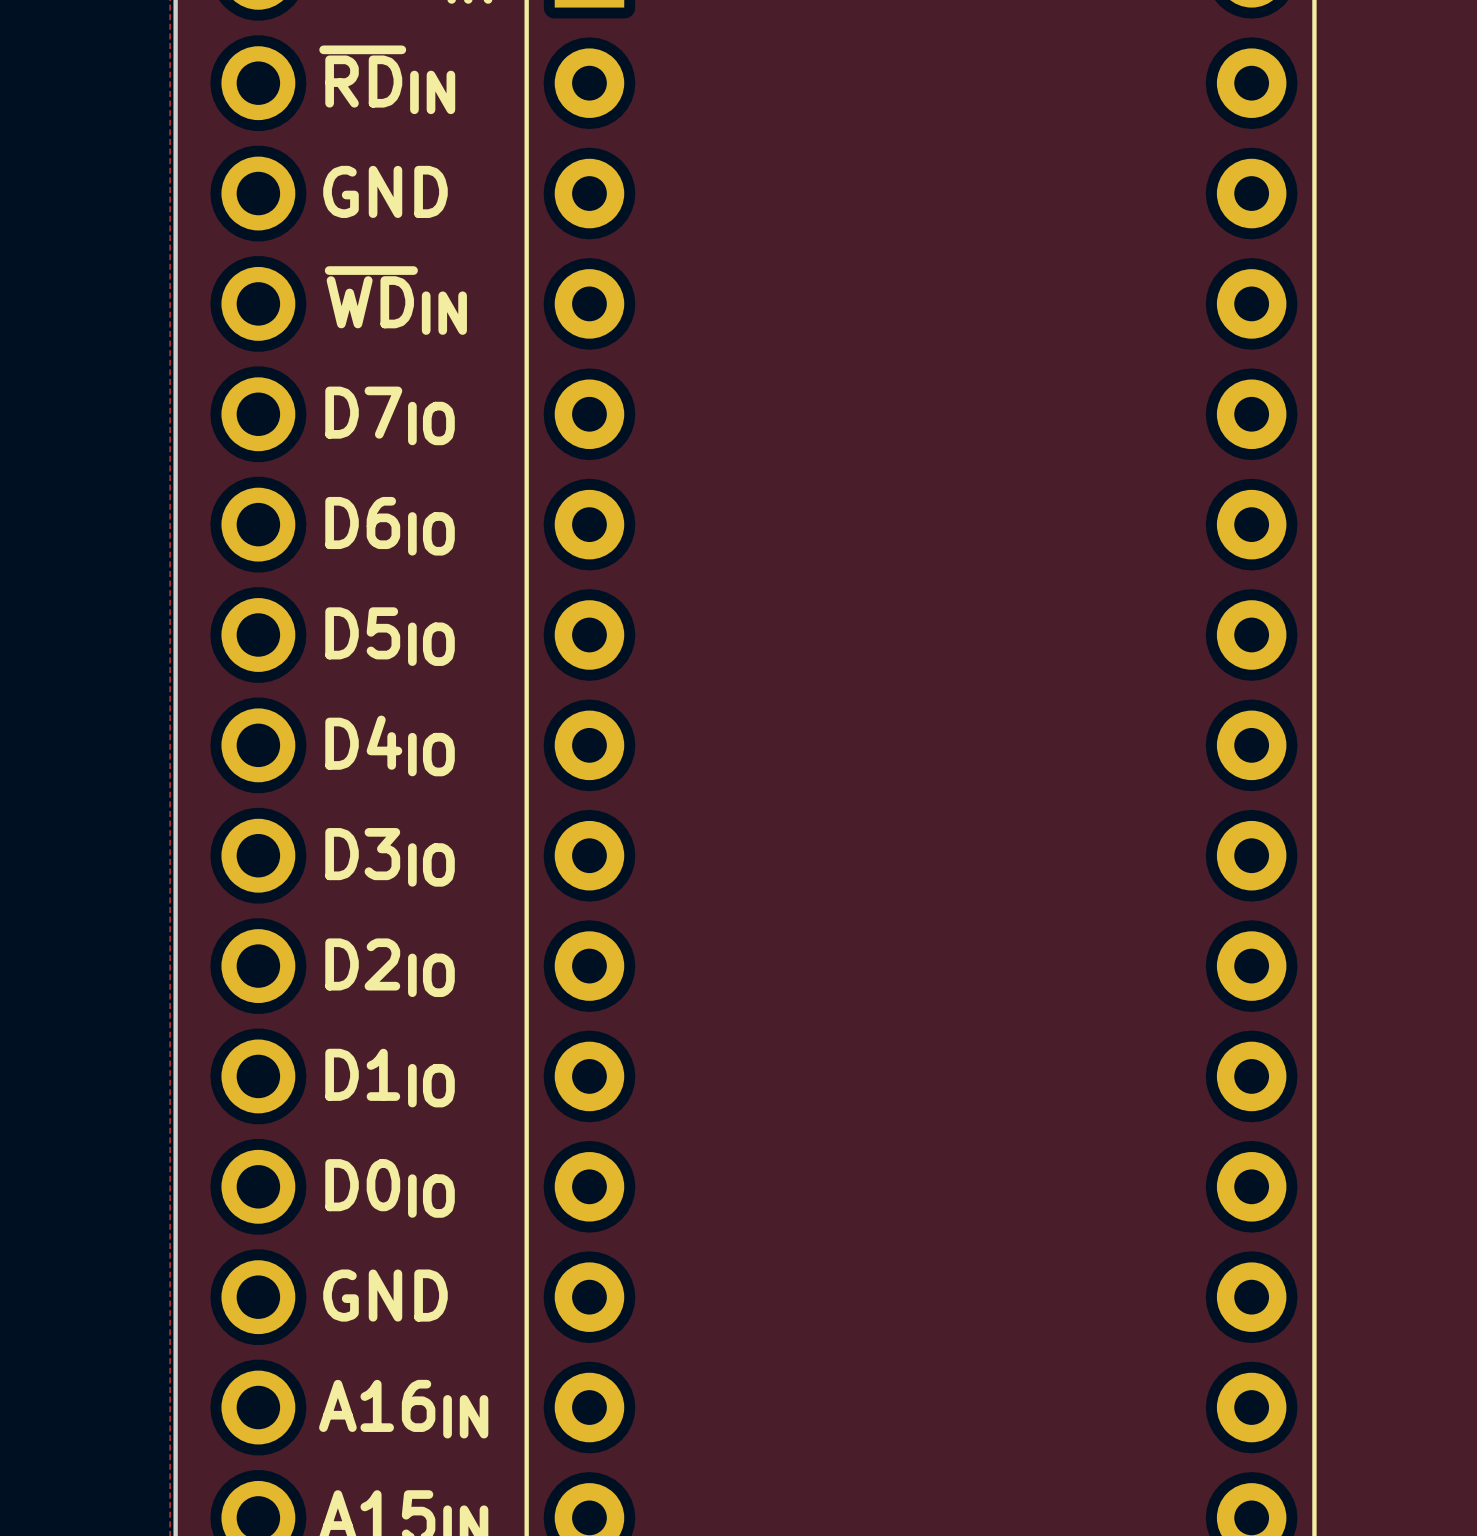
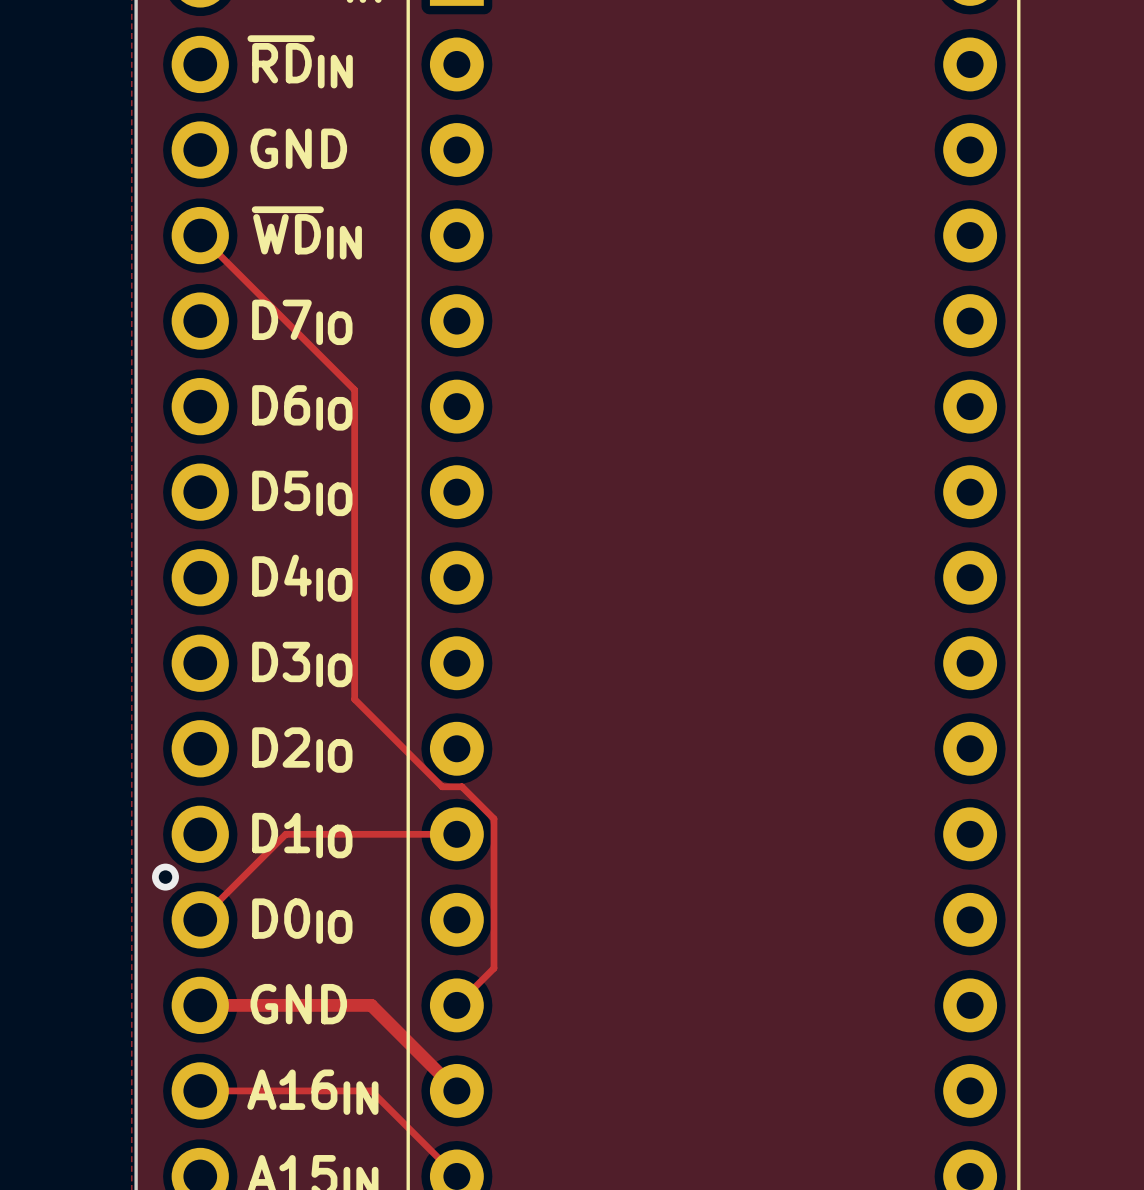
track: none -> (200, 235) (354, 389) (354, 699) (442, 786) (461, 786) (493, 818) (493, 968) (456, 1005)
track: none -> (456, 834) (285, 834) (200, 919)
via: none -> (165, 877)
track: none -> (200, 1005) (371, 1005) (456, 1090)
track: none -> (200, 1090) (371, 1090) (456, 1176)

